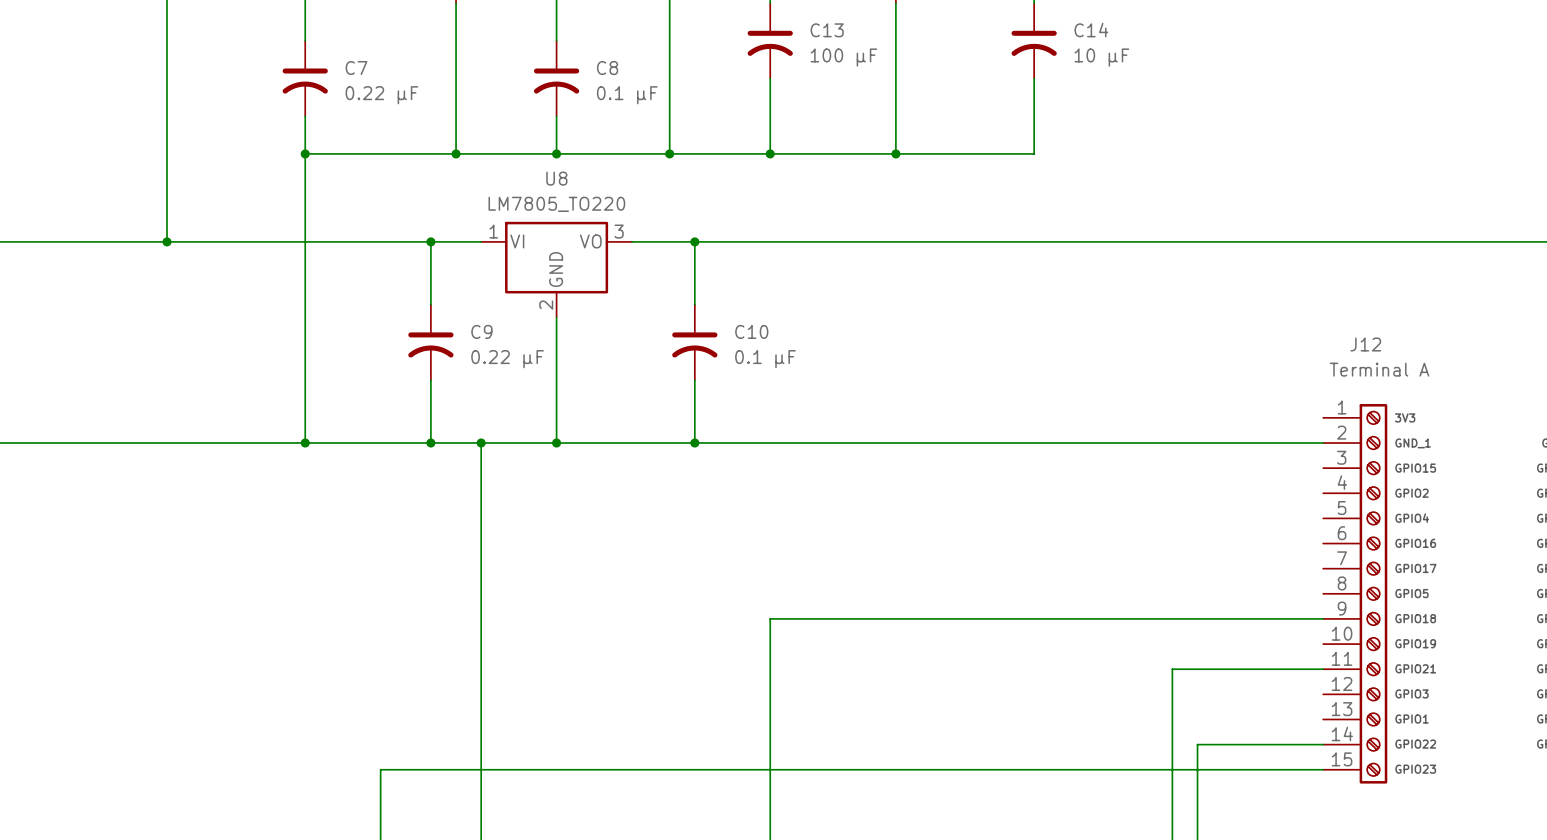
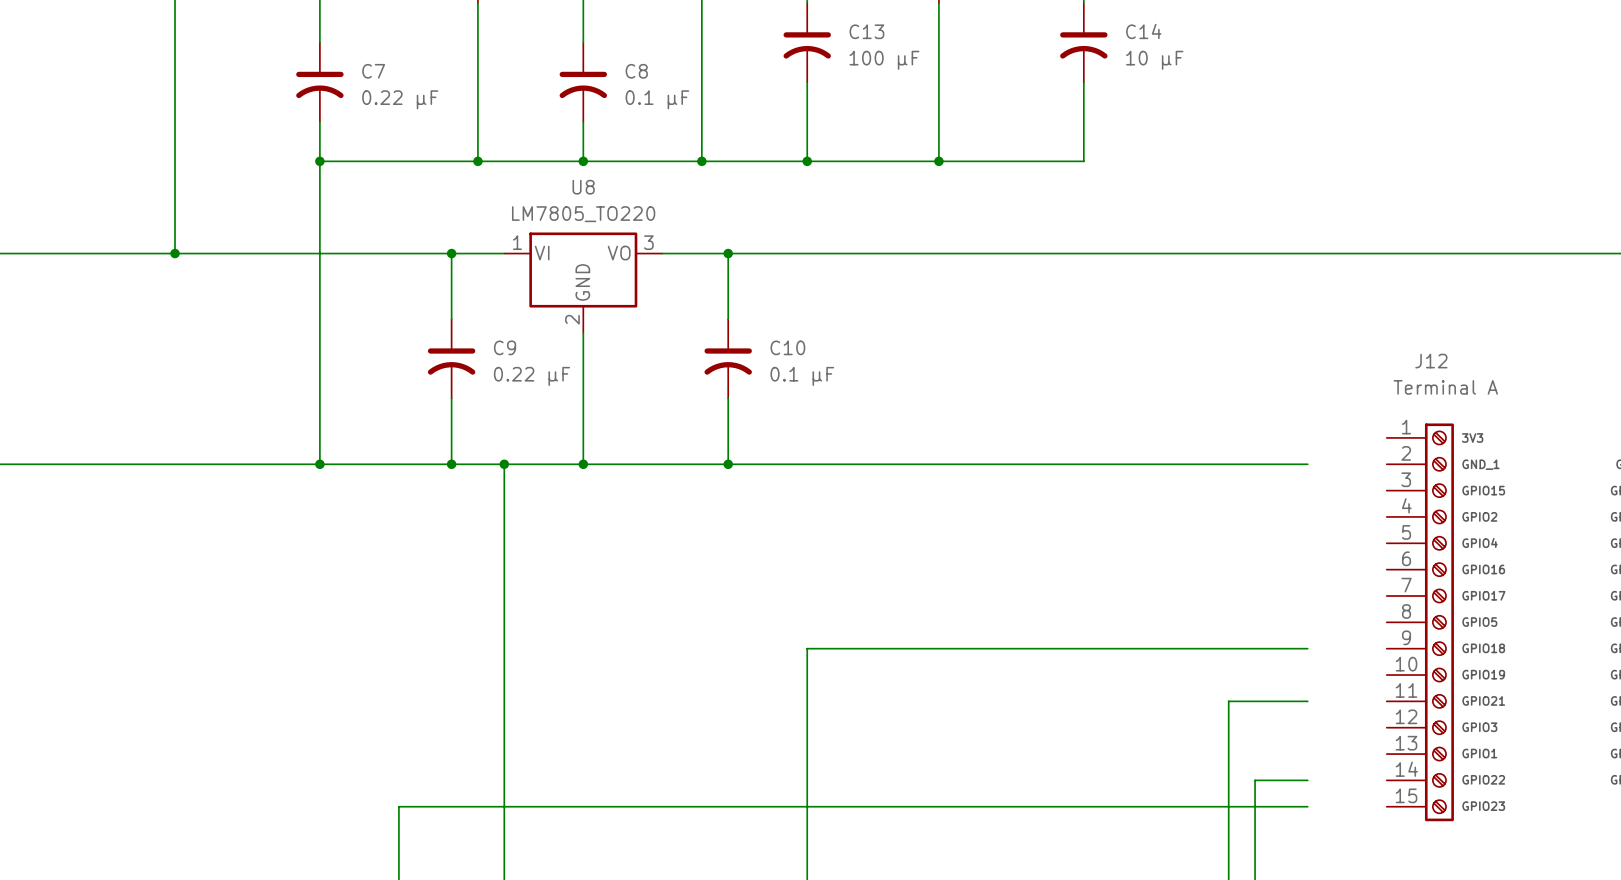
wire: (1247, 443) (1323, 443) -> none
wire: (1247, 618) (1323, 618) -> none
wire: (1247, 669) (1323, 669) -> none
wire: (1247, 744) (1323, 744) -> none
wire: (1247, 769) (1323, 769) -> none

